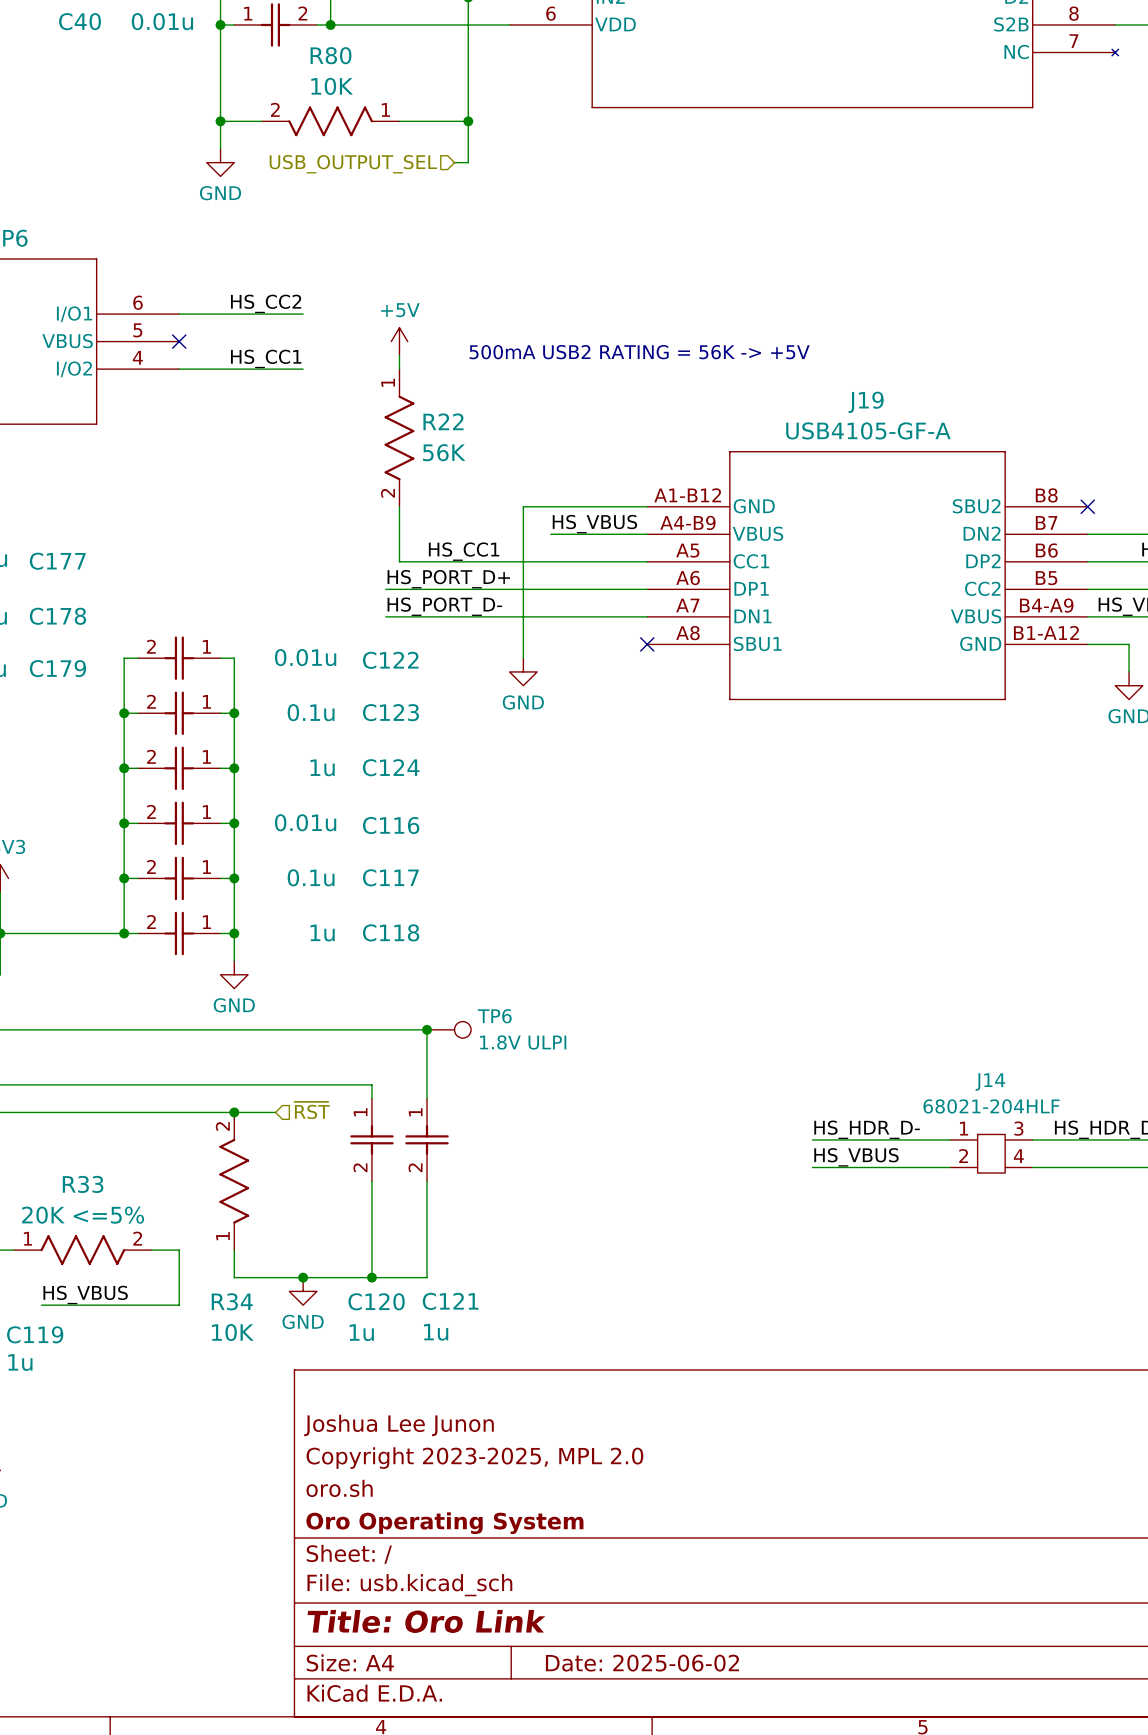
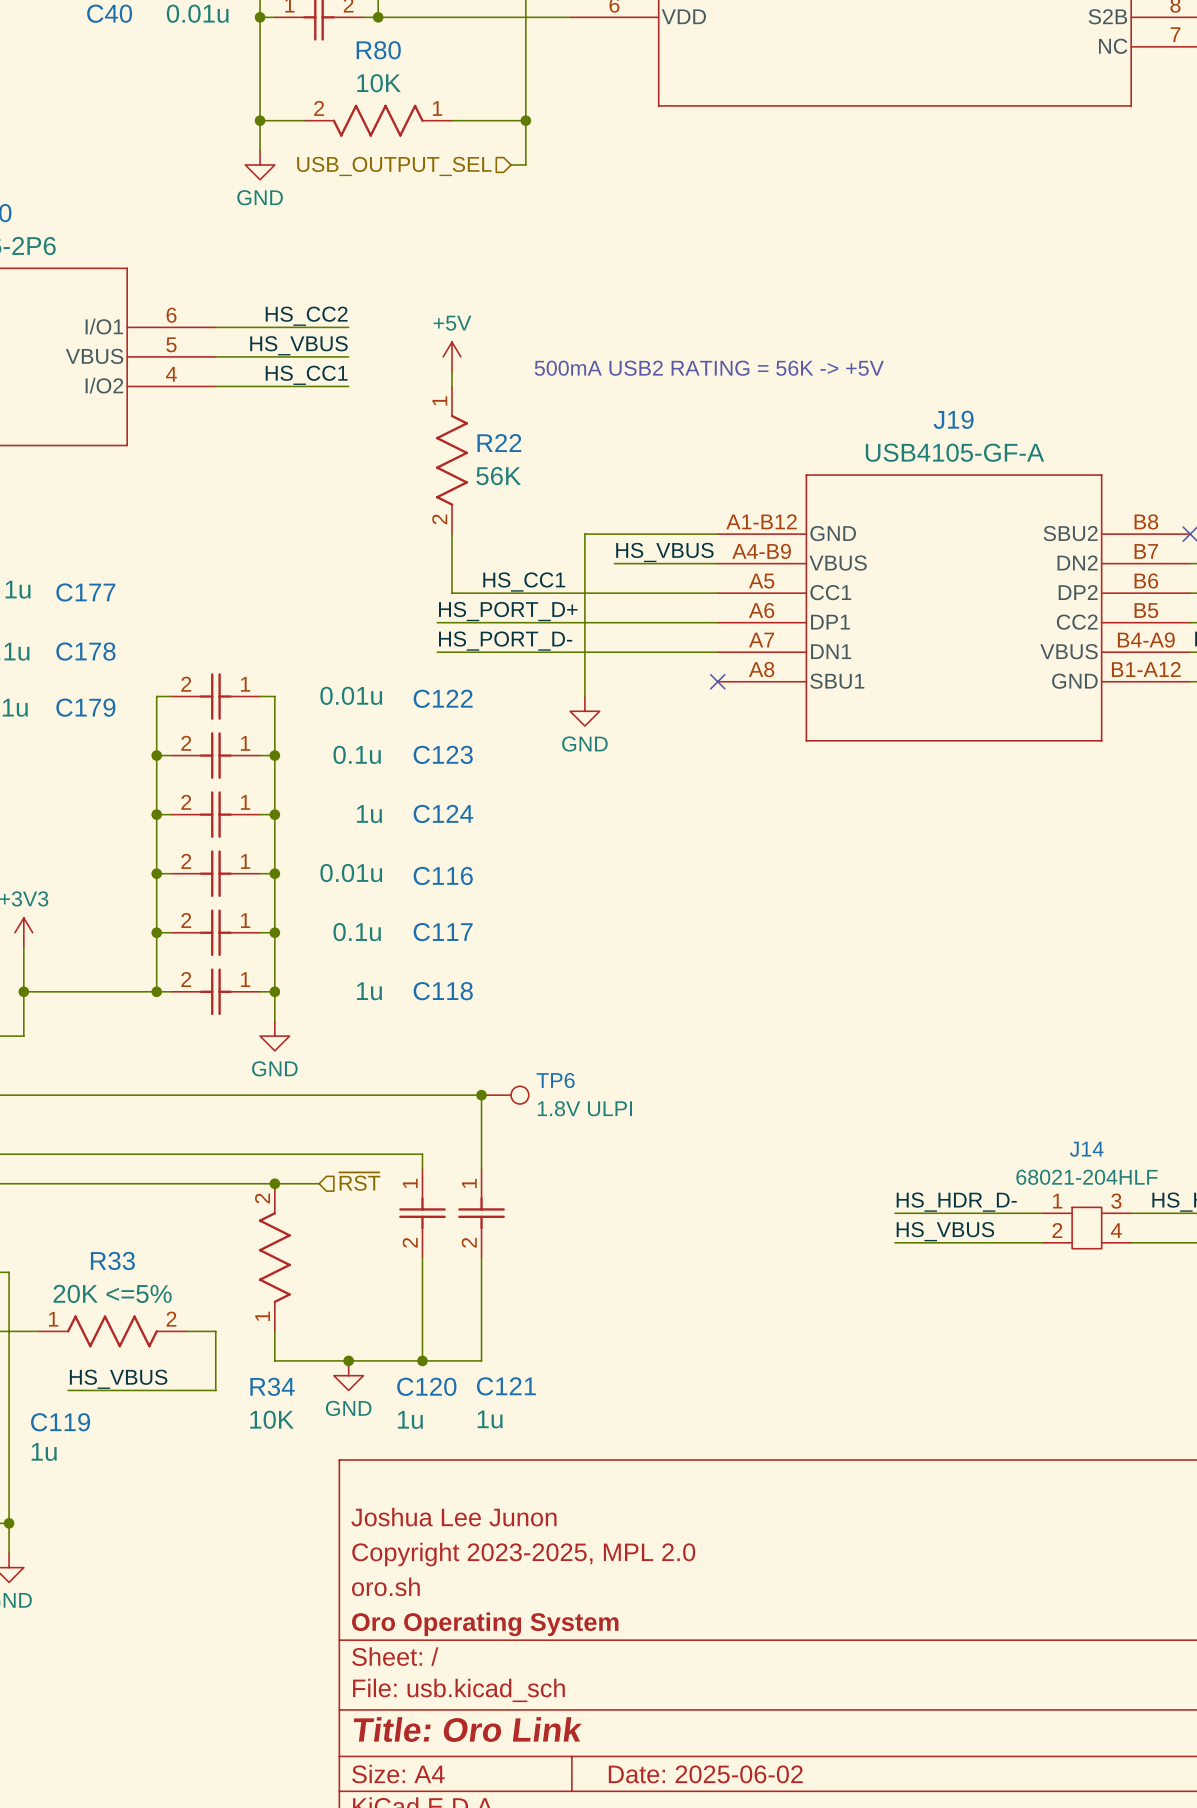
label: none -> HS_VBUS (298, 345)
wire: none -> (215, 356) (348, 356)
no-connect mark: (179, 341) -> none

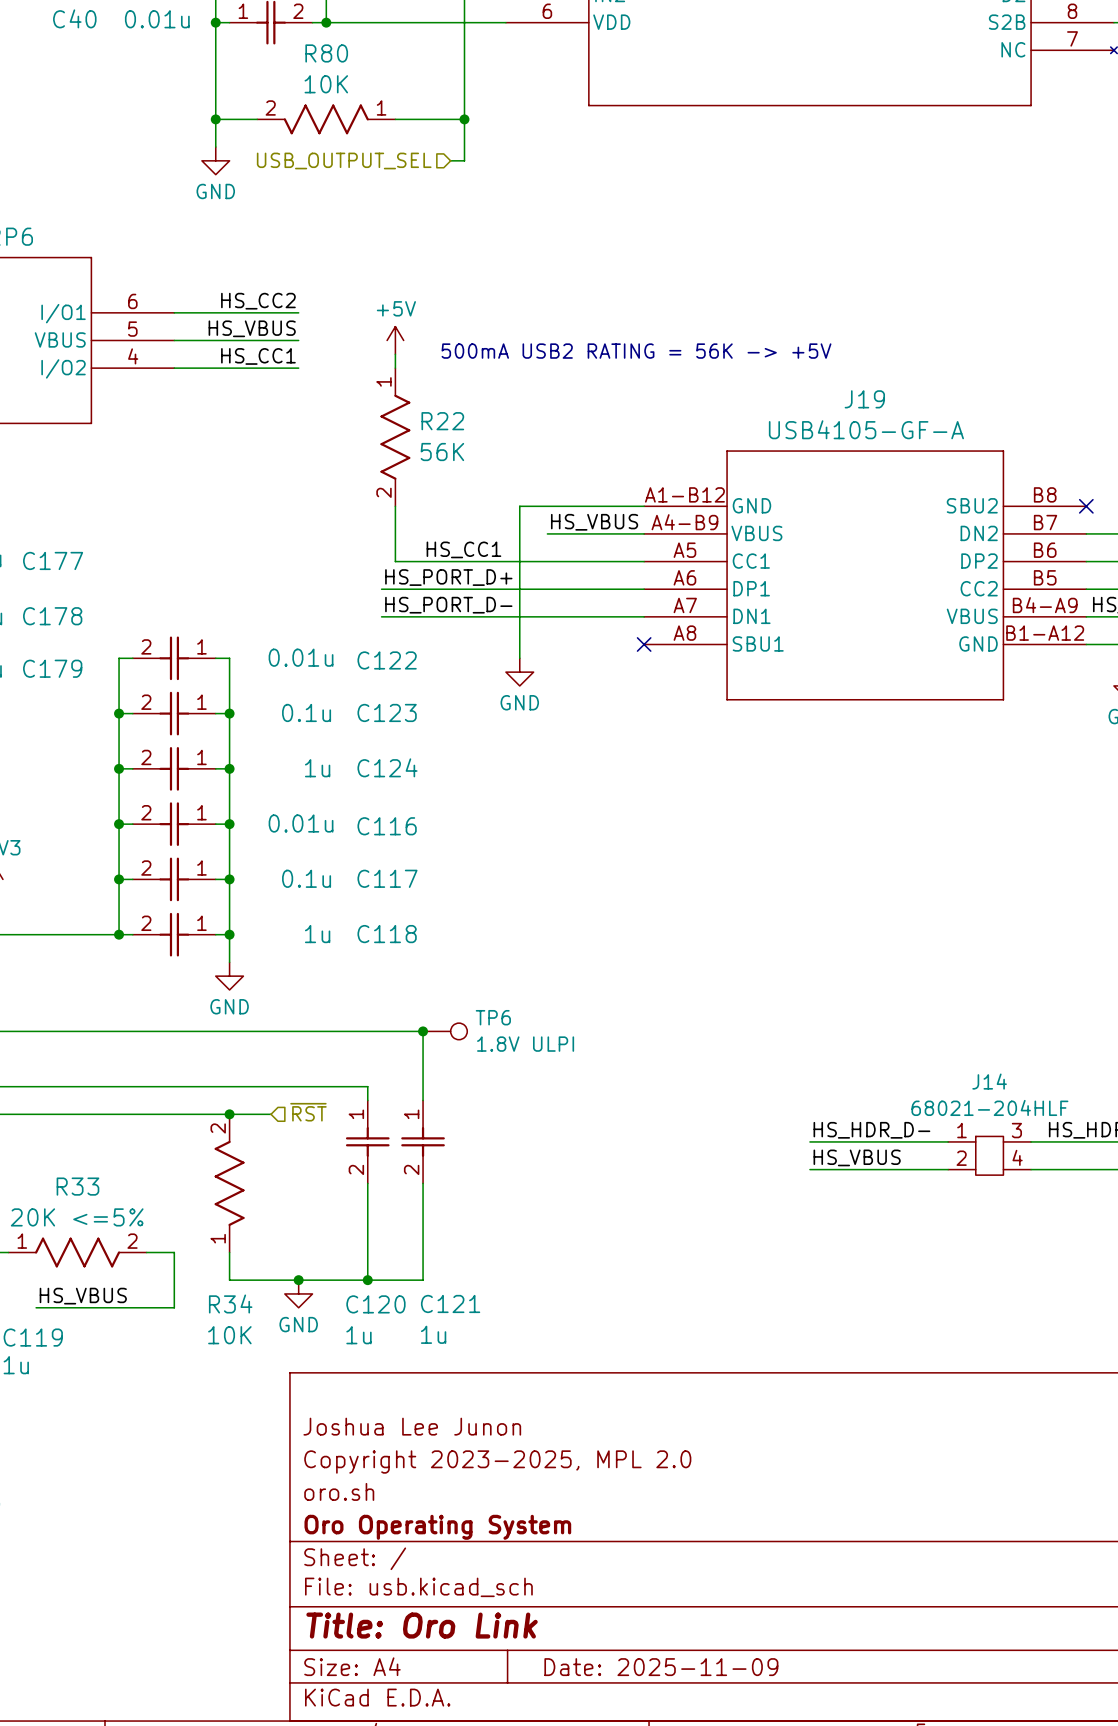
title block: Date: 2025-06-02 (705, 1774) -> Date: 2025-11-09 (661, 1667)

